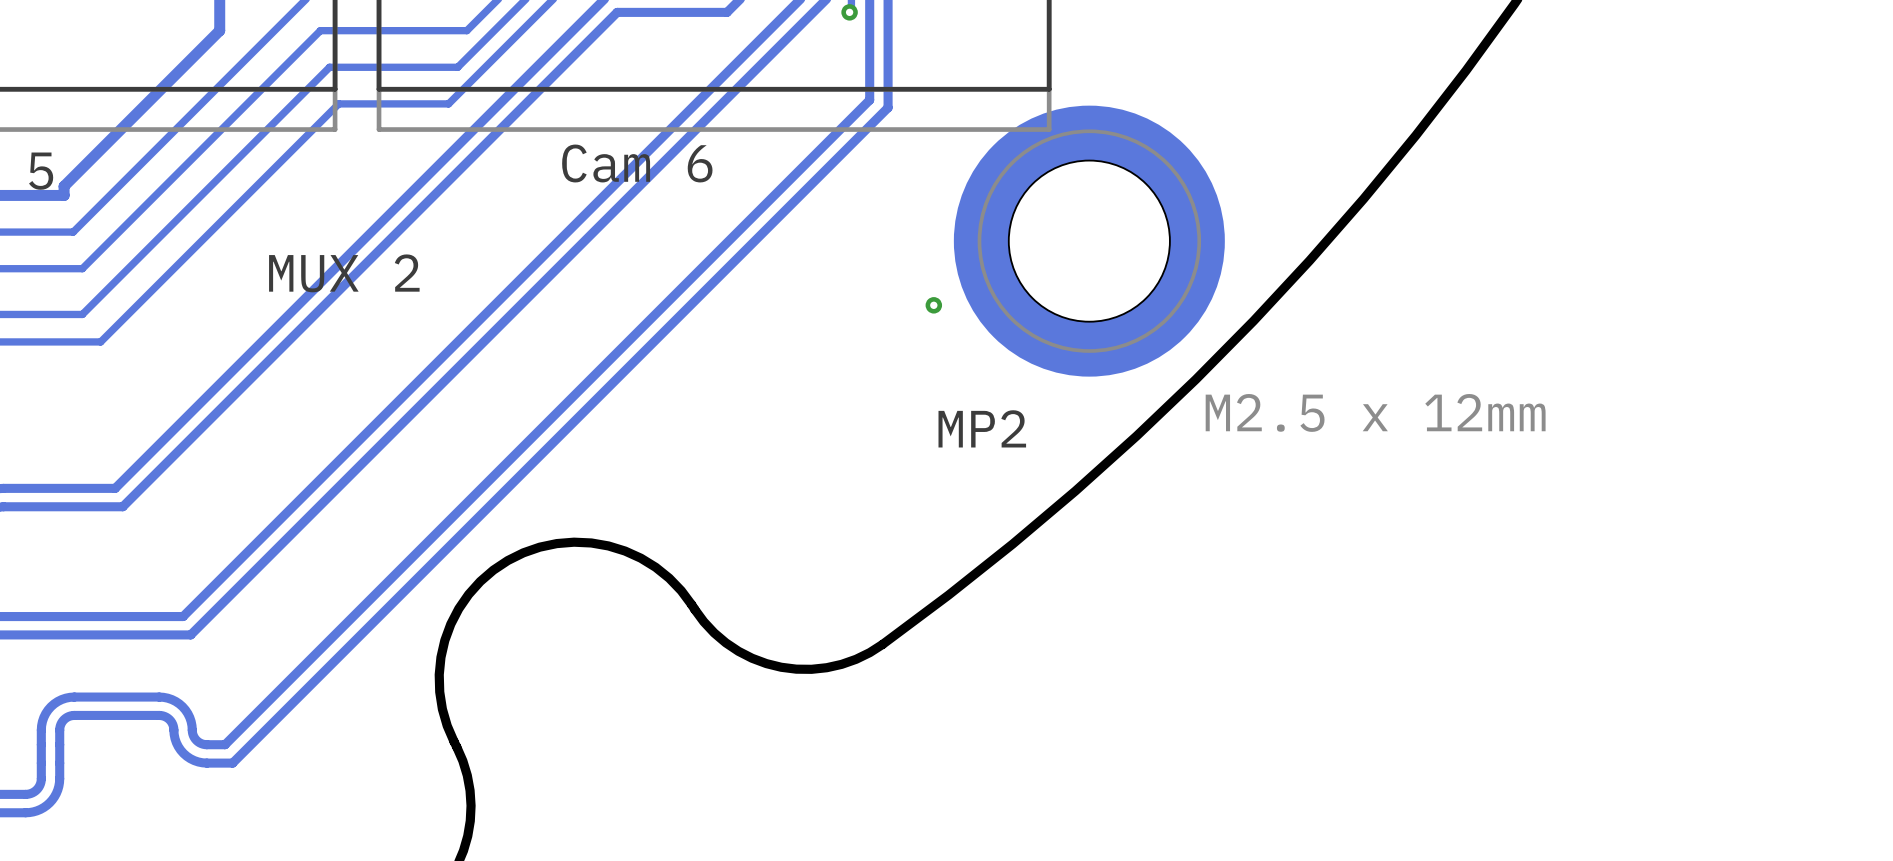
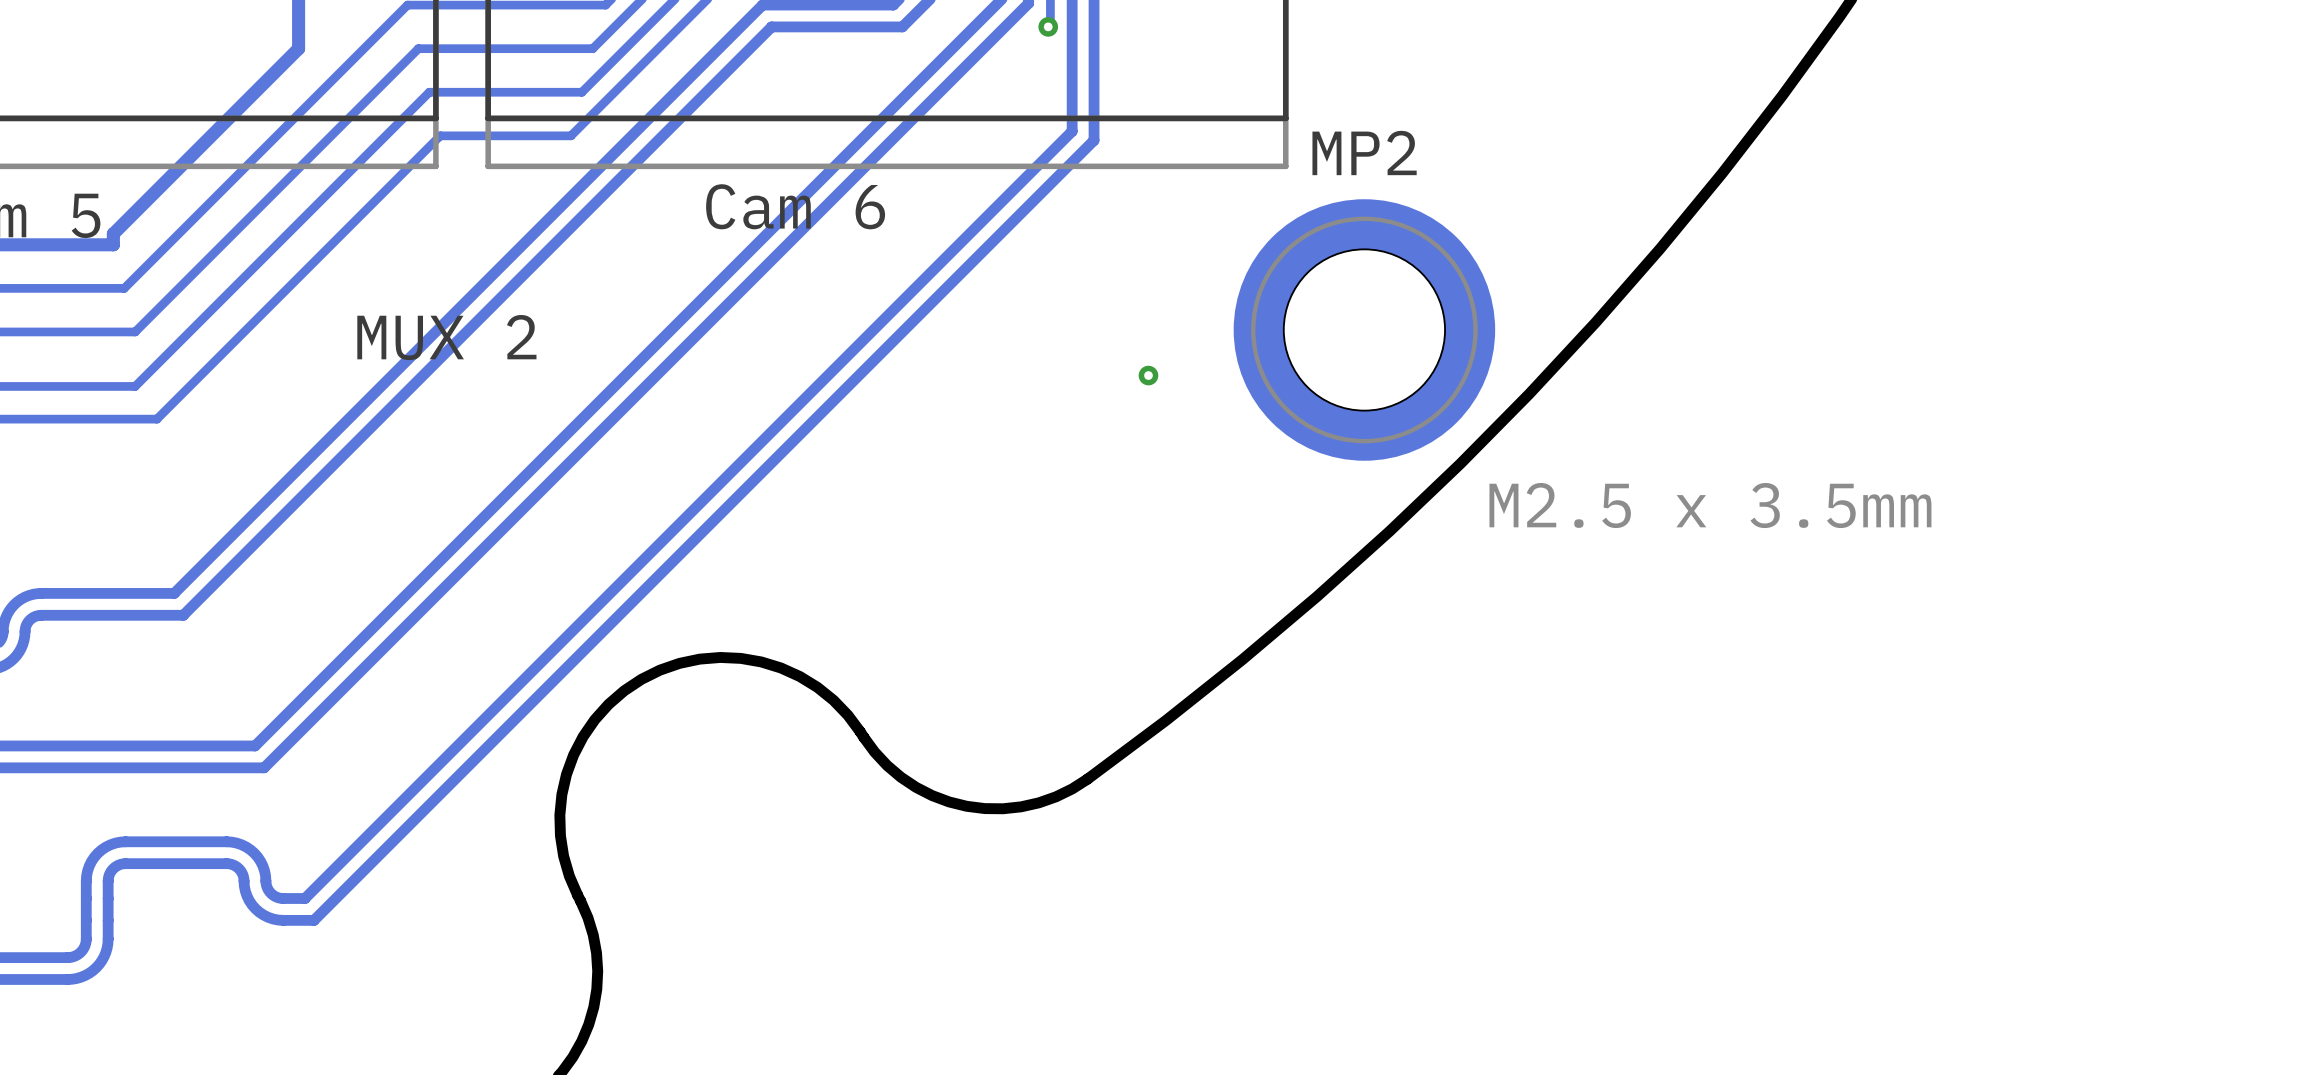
MP2 footprint: [953, 105, 1225, 377] -> [1233, 199, 1496, 461]
MP2 value: M2.5 x 12mm (1375, 412) -> M2.5 x 3.5mm (1710, 505)
MP2 name position: MP2 (982, 428) -> MP2 (1364, 152)

